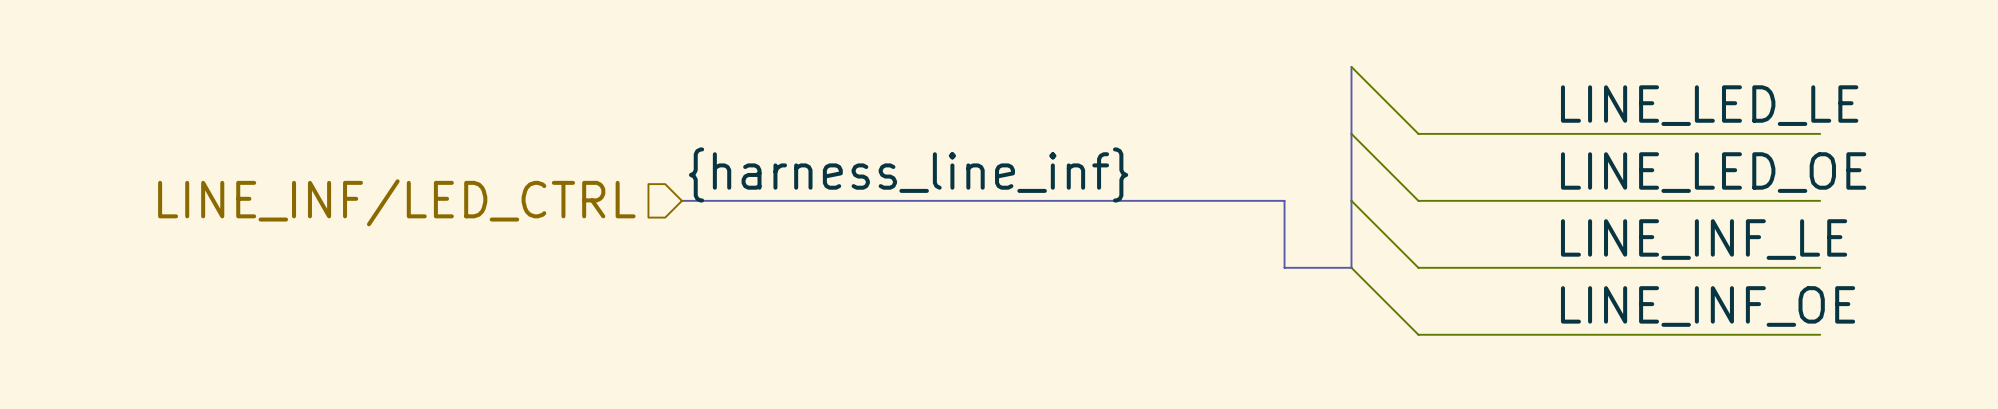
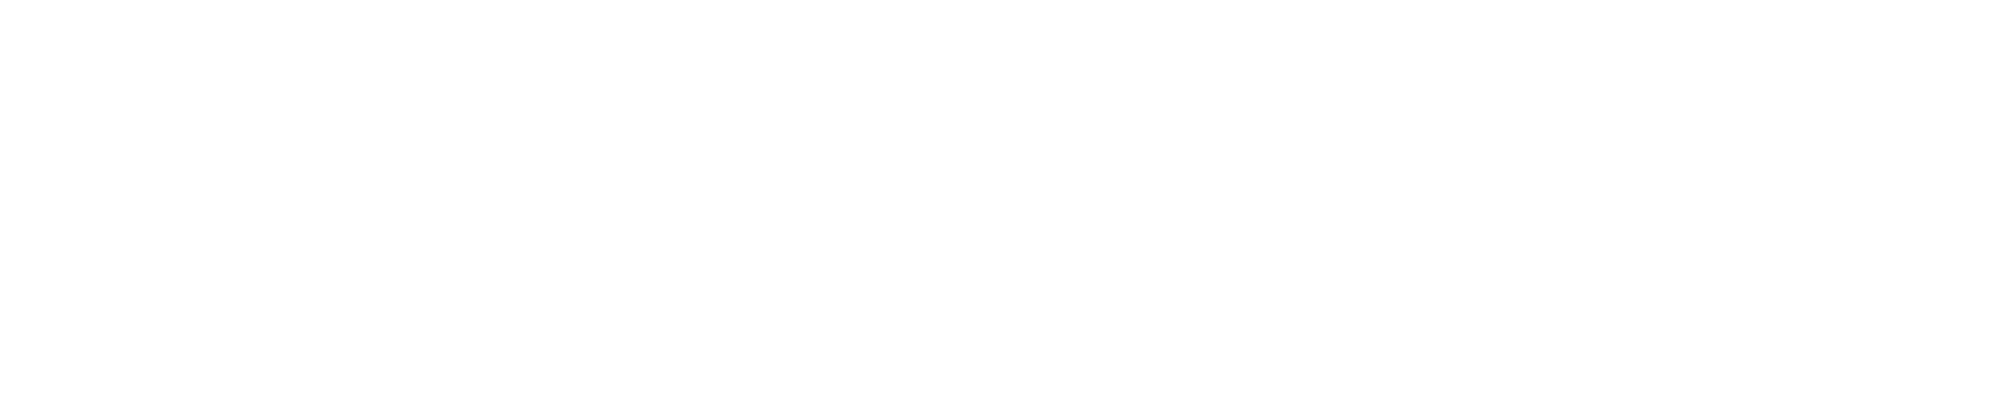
wire: (1351, 66) (1418, 133) (1820, 133) -> none
bus: (1351, 66) (1351, 267) (1284, 267) (1284, 200) (681, 200) -> none
label: LINE_LED_LE (1709, 105) -> none
wire: (1351, 133) (1418, 200) (1820, 200) -> none
label: LINE_LED_OE (1713, 172) -> none
label: {harness_line_inf} (908, 174) -> none
wire: (1351, 200) (1418, 267) (1820, 267) -> none
hierarchical label: LINE_INF/LED_CTRL (396, 202) -> none
label: LINE_INF_LE (1704, 239) -> none
wire: (1351, 267) (1418, 334) (1820, 334) -> none
label: LINE_INF_OE (1708, 306) -> none

